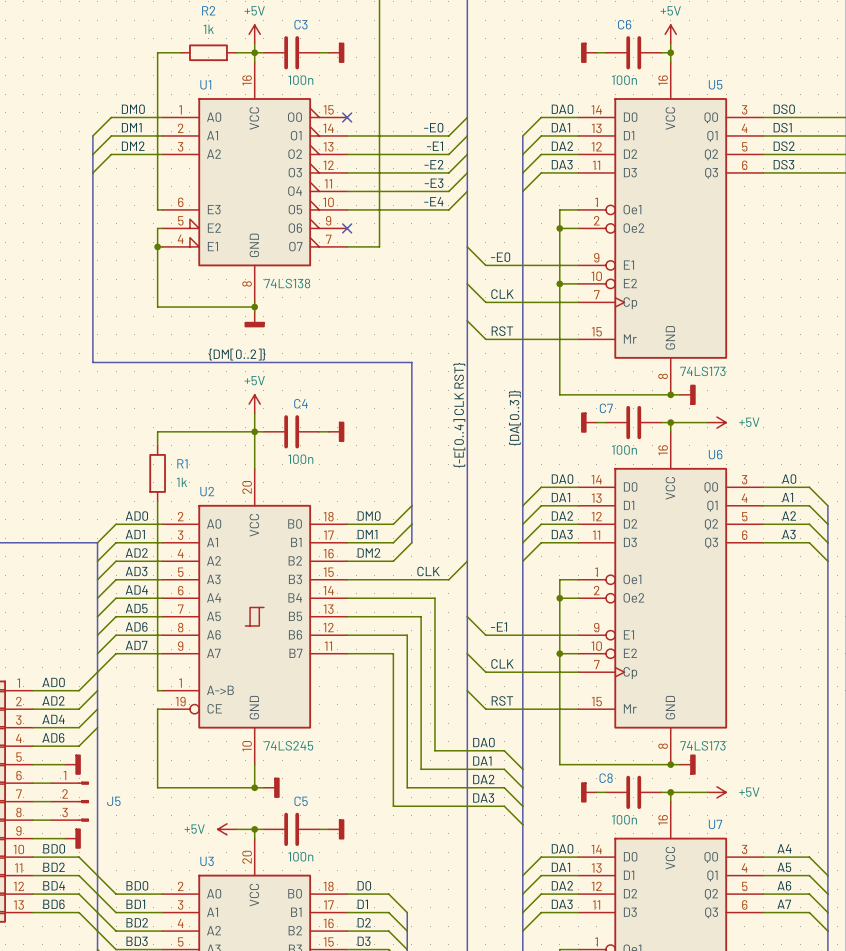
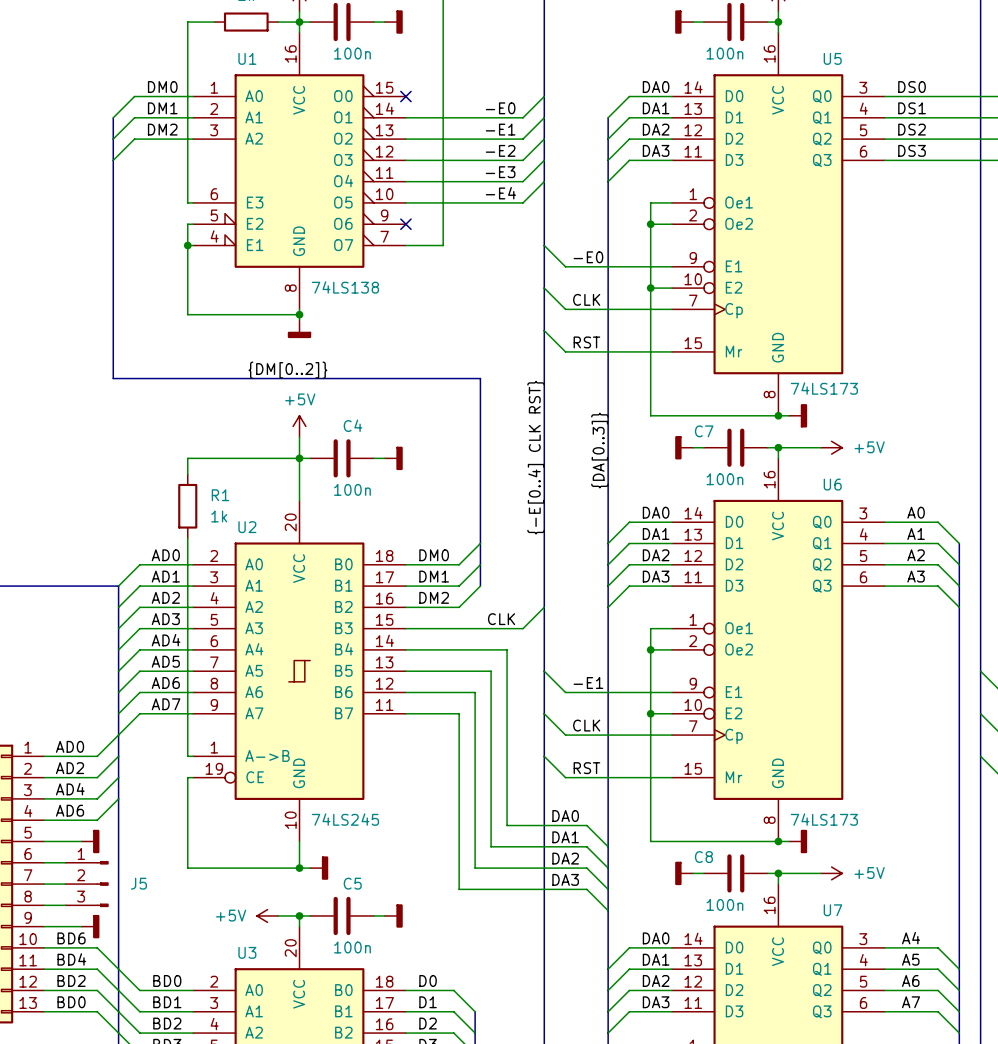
label: BD0 (54, 848) -> BD6 (71, 938)
label: BD2 (54, 867) -> BD4 (71, 959)
label: BD4 (54, 885) -> BD2 (71, 980)
label: BD6 (53, 904) -> BD0 (71, 1002)

